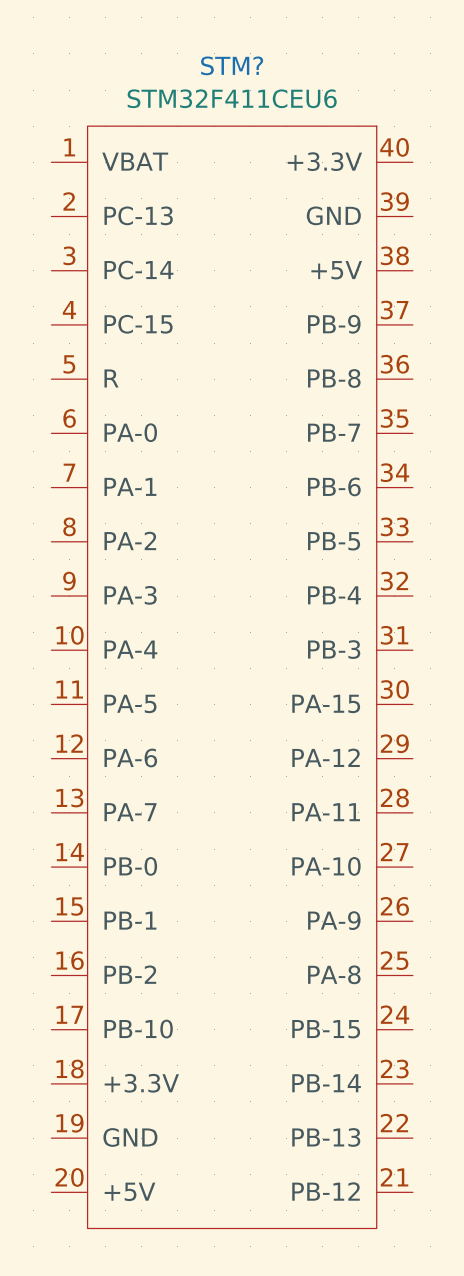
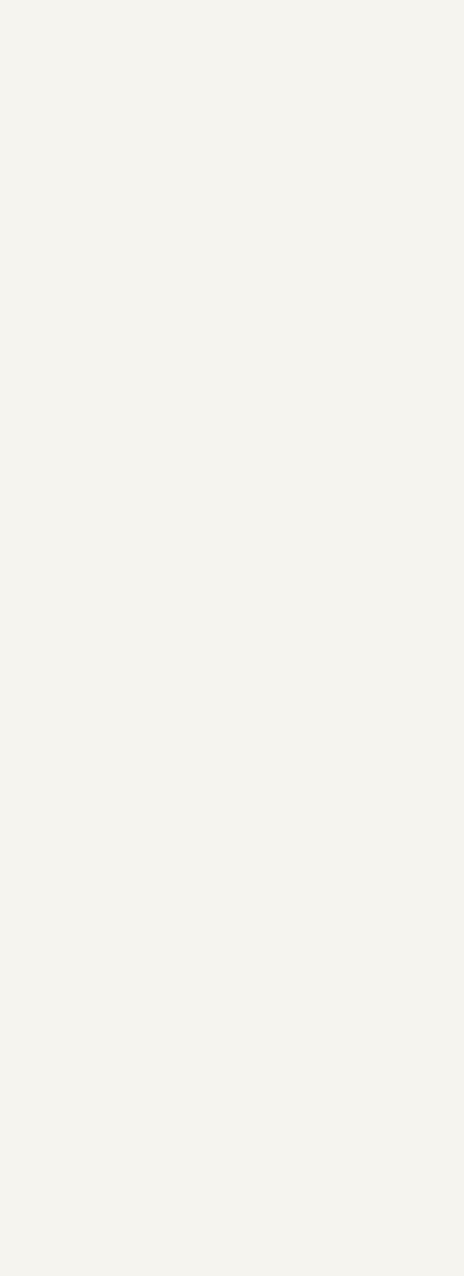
STM?: STM32F411CEU6 (232, 677) -> none

